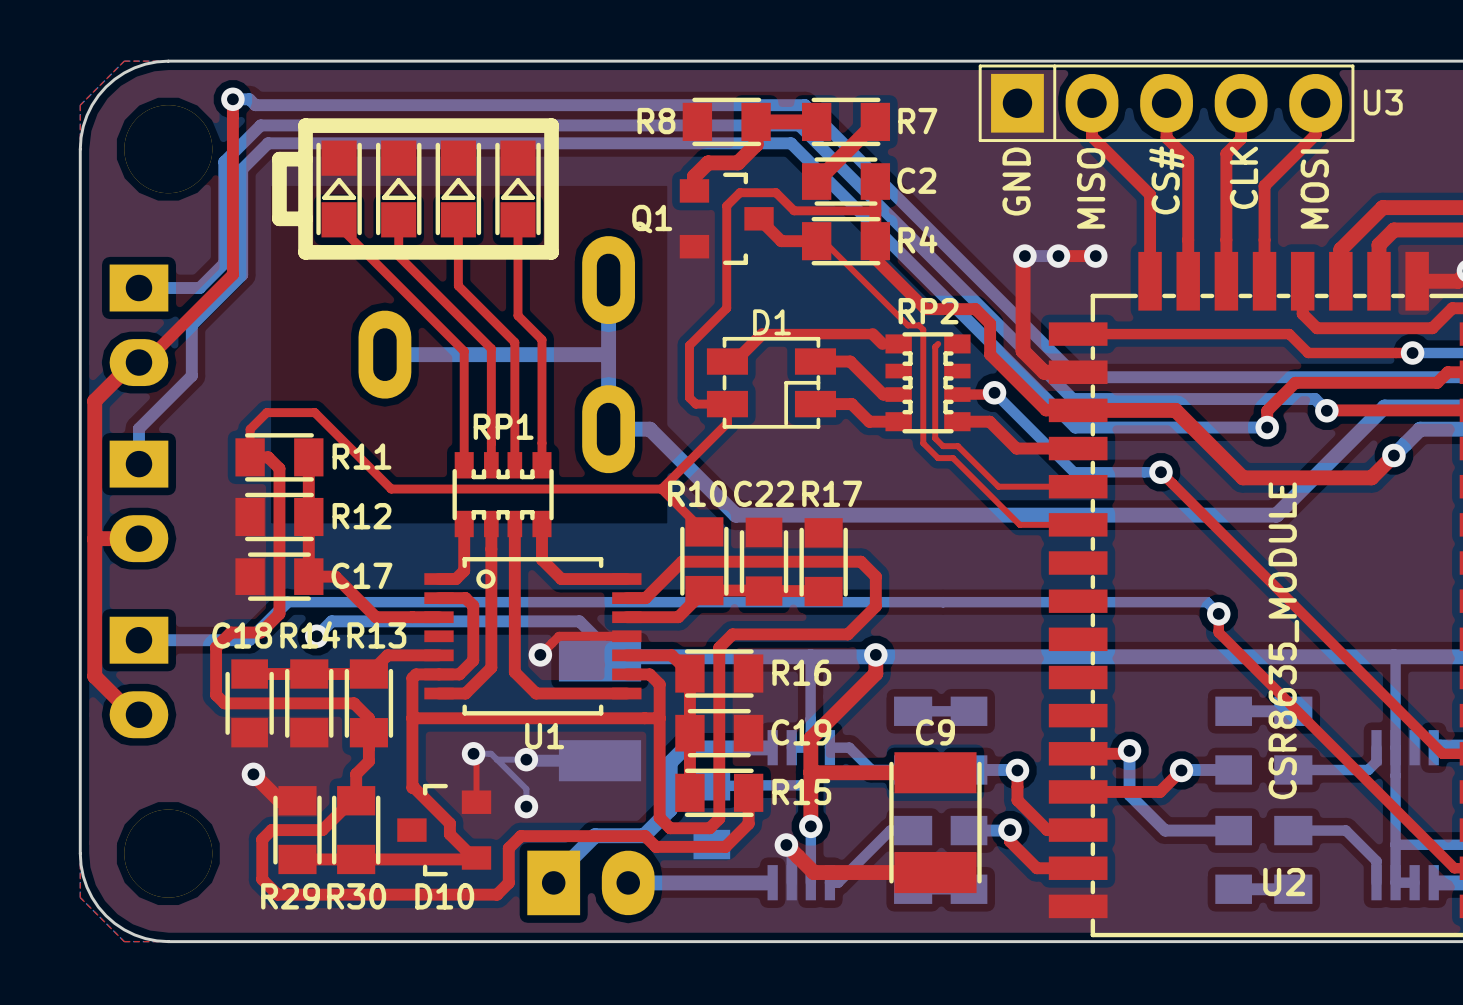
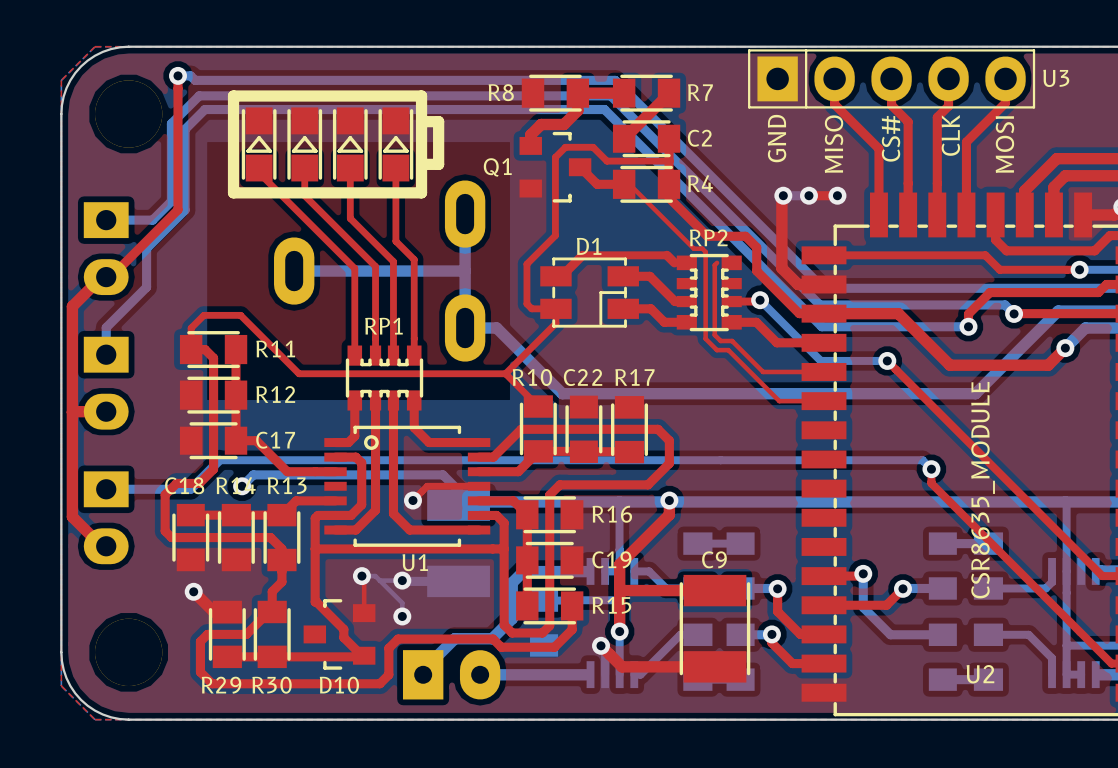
line: (305, 159) (279, 159) (279, 218) (305, 218) -> none
line: none -> (421, 121) (438, 121) (438, 164) (421, 164)

